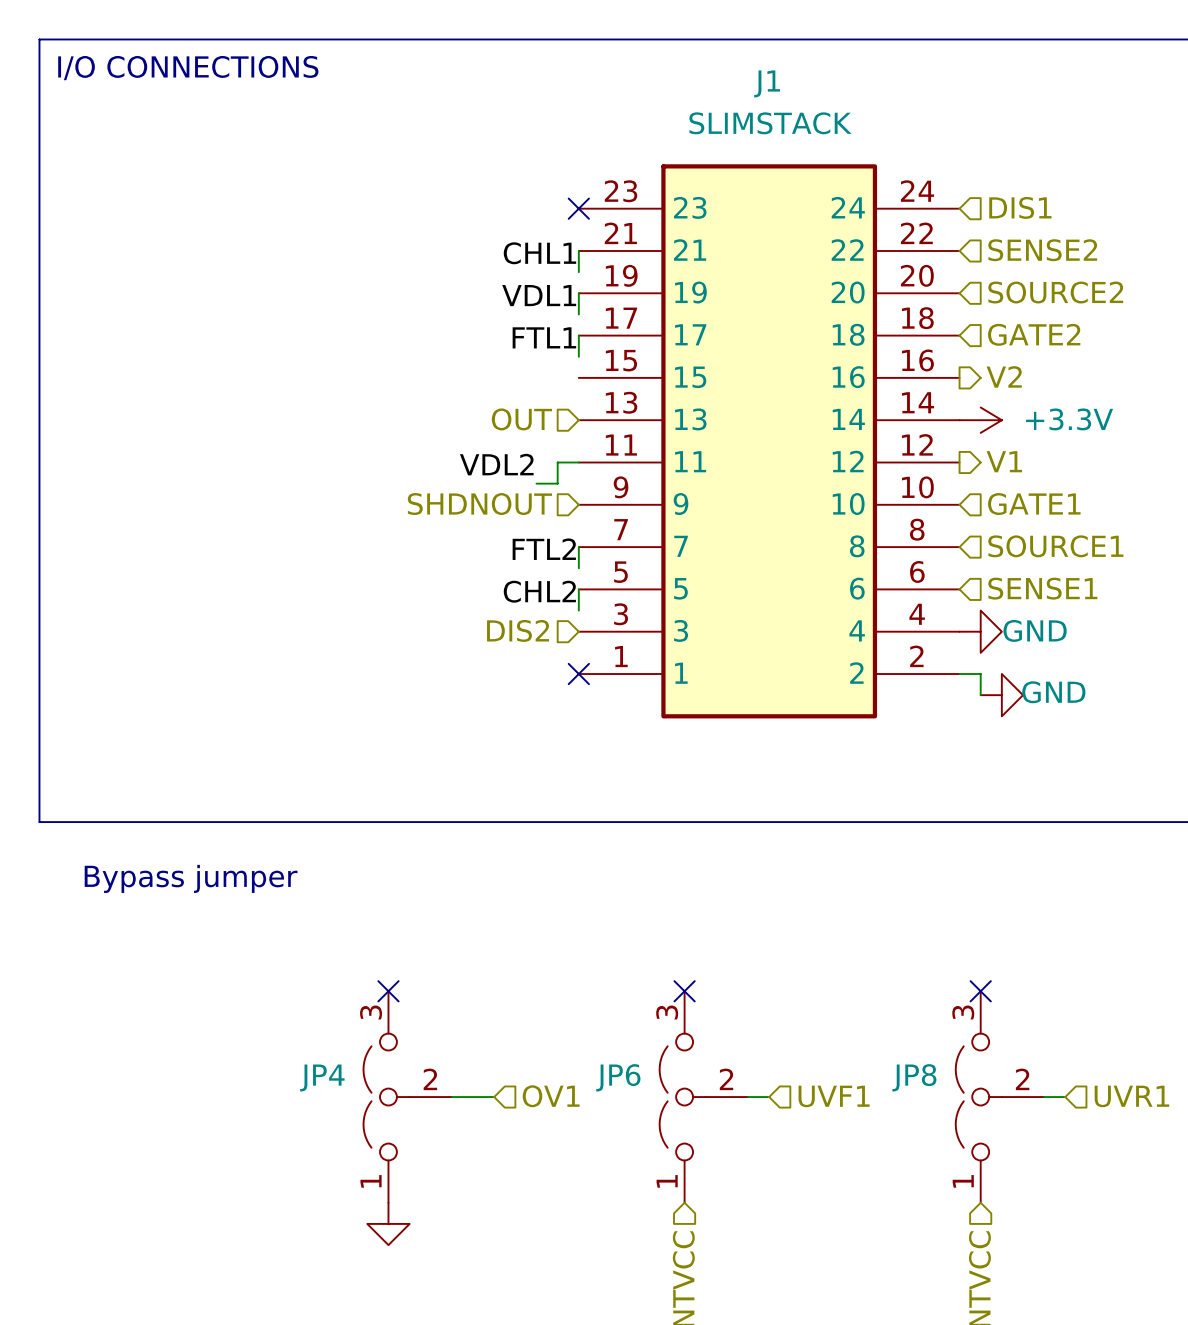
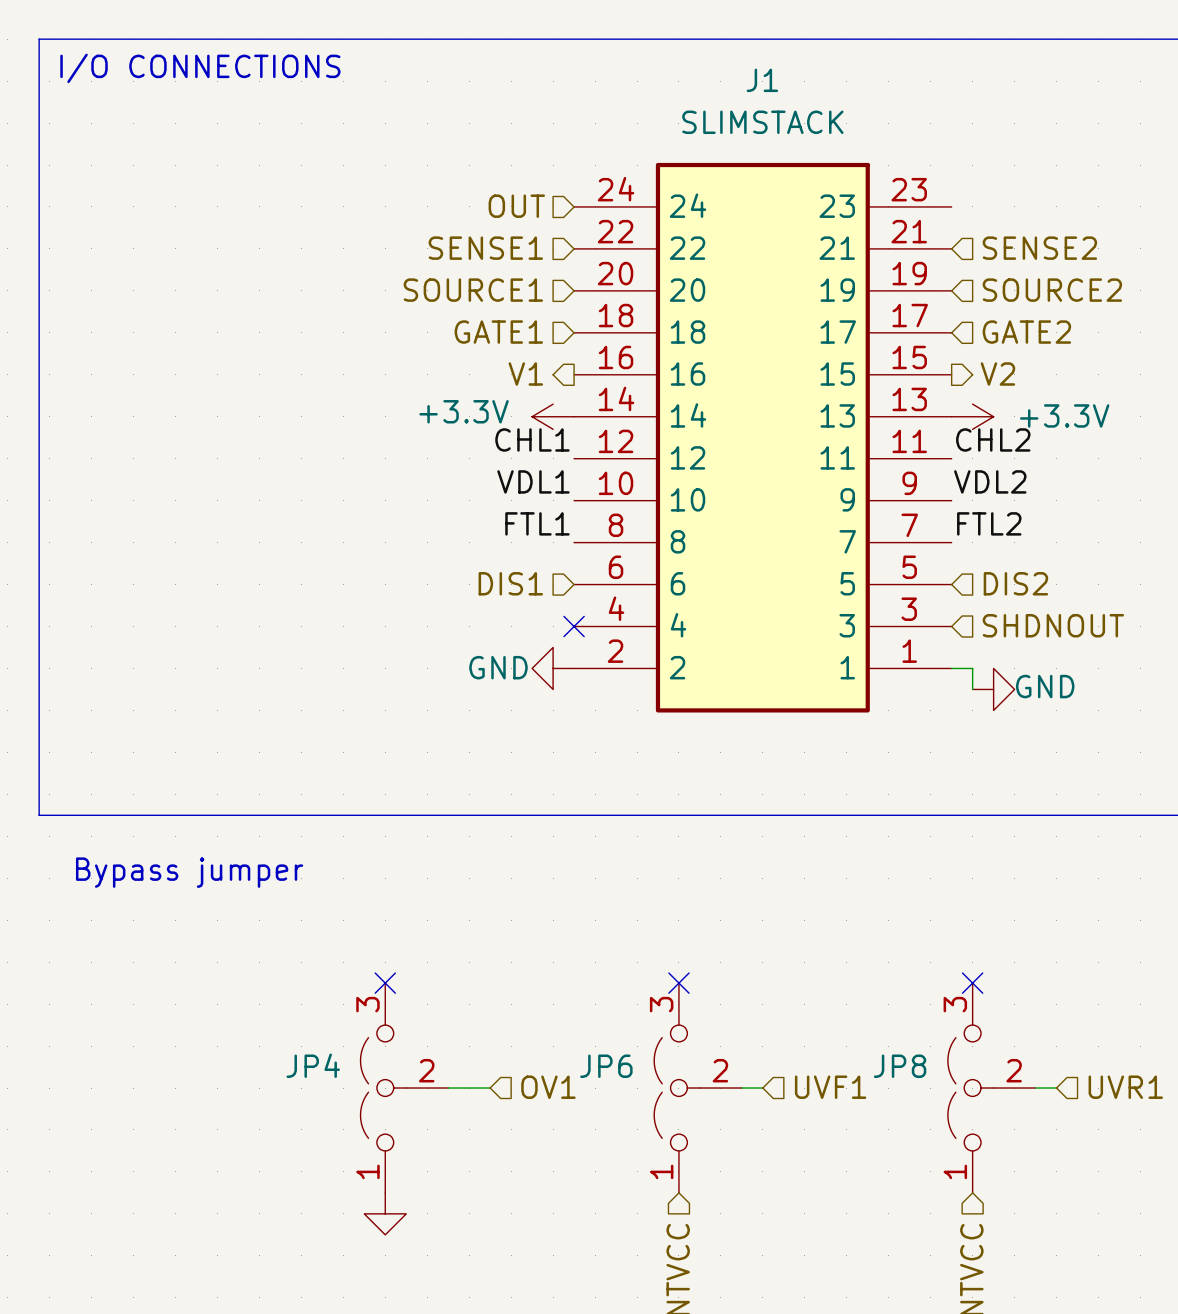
hierarchical label: DIS1 (1020, 207) -> none
no-connect mark: (578, 208) -> none
hierarchical label: none -> SENSE1 (485, 248)
wire: (578, 250) (578, 272) -> none
label position: CHL1 (539, 253) -> CHL1 (532, 439)
hierarchical label: none -> SOURCE1 (473, 290)
wire: (578, 293) (578, 314) -> none
label position: VDL1 (539, 295) -> VDL1 (533, 481)
hierarchical label: none -> GATE1 (498, 332)
wire: (578, 335) (578, 356) -> none
label position: FTL1 (544, 337) -> FTL1 (537, 523)
hierarchical label: none -> V1 (525, 374)
hierarchical label position: OUT (521, 419) -> OUT (516, 206)
power symbol: none -> +3.3V (553, 416)
J1 flip: as is (769, 441) -> left-right (762, 437)
hierarchical label: V1 (1004, 461) -> none
wire: (578, 462) (557, 462) (557, 483) (536, 483) -> none
label: VDL2 (496, 464) -> none
label: none -> VDL2 (990, 481)
hierarchical label: SHDNOUT (479, 504) -> none
hierarchical label: GATE1 (1034, 504) -> none
hierarchical label: SOURCE1 (1055, 546) -> none
wire: (578, 547) (578, 568) -> none
label position: FTL2 (544, 549) -> FTL2 (989, 523)
hierarchical label: SENSE1 (1042, 588) -> DIS2 (1015, 583)
wire: (578, 589) (578, 610) -> none
label position: CHL2 (539, 591) -> CHL2 (993, 439)
hierarchical label: DIS2 (518, 630) -> DIS1 (510, 583)
hierarchical label: none -> SHDNOUT (1053, 625)
power symbol: GND (980, 631) -> none
power symbol: none -> GND (553, 668)
no-connect mark position: (578, 674) -> (574, 626)

